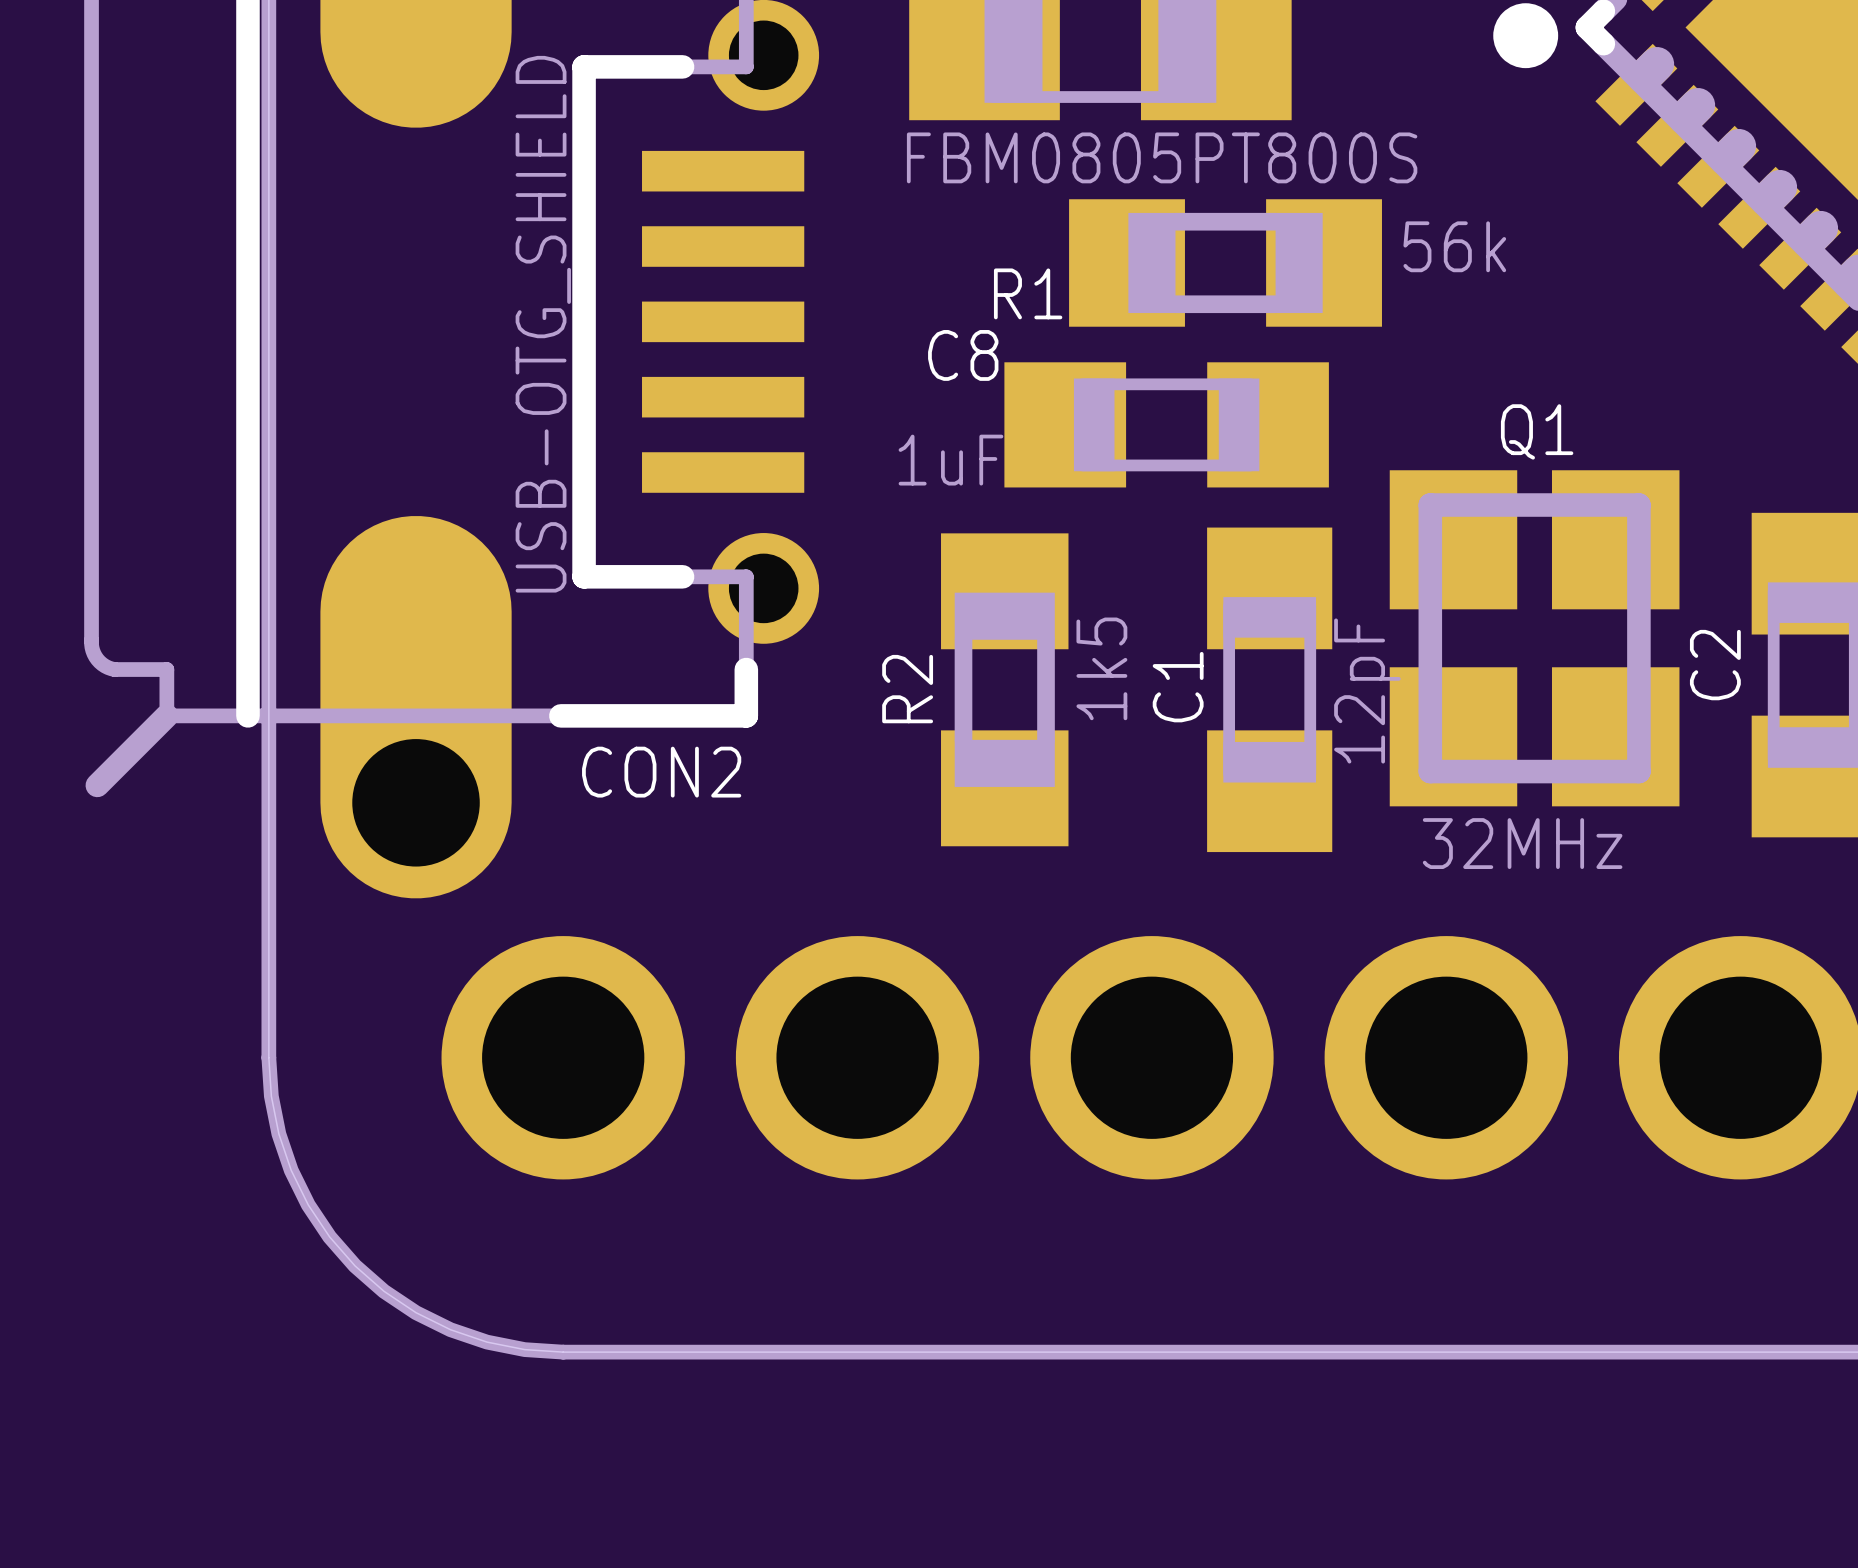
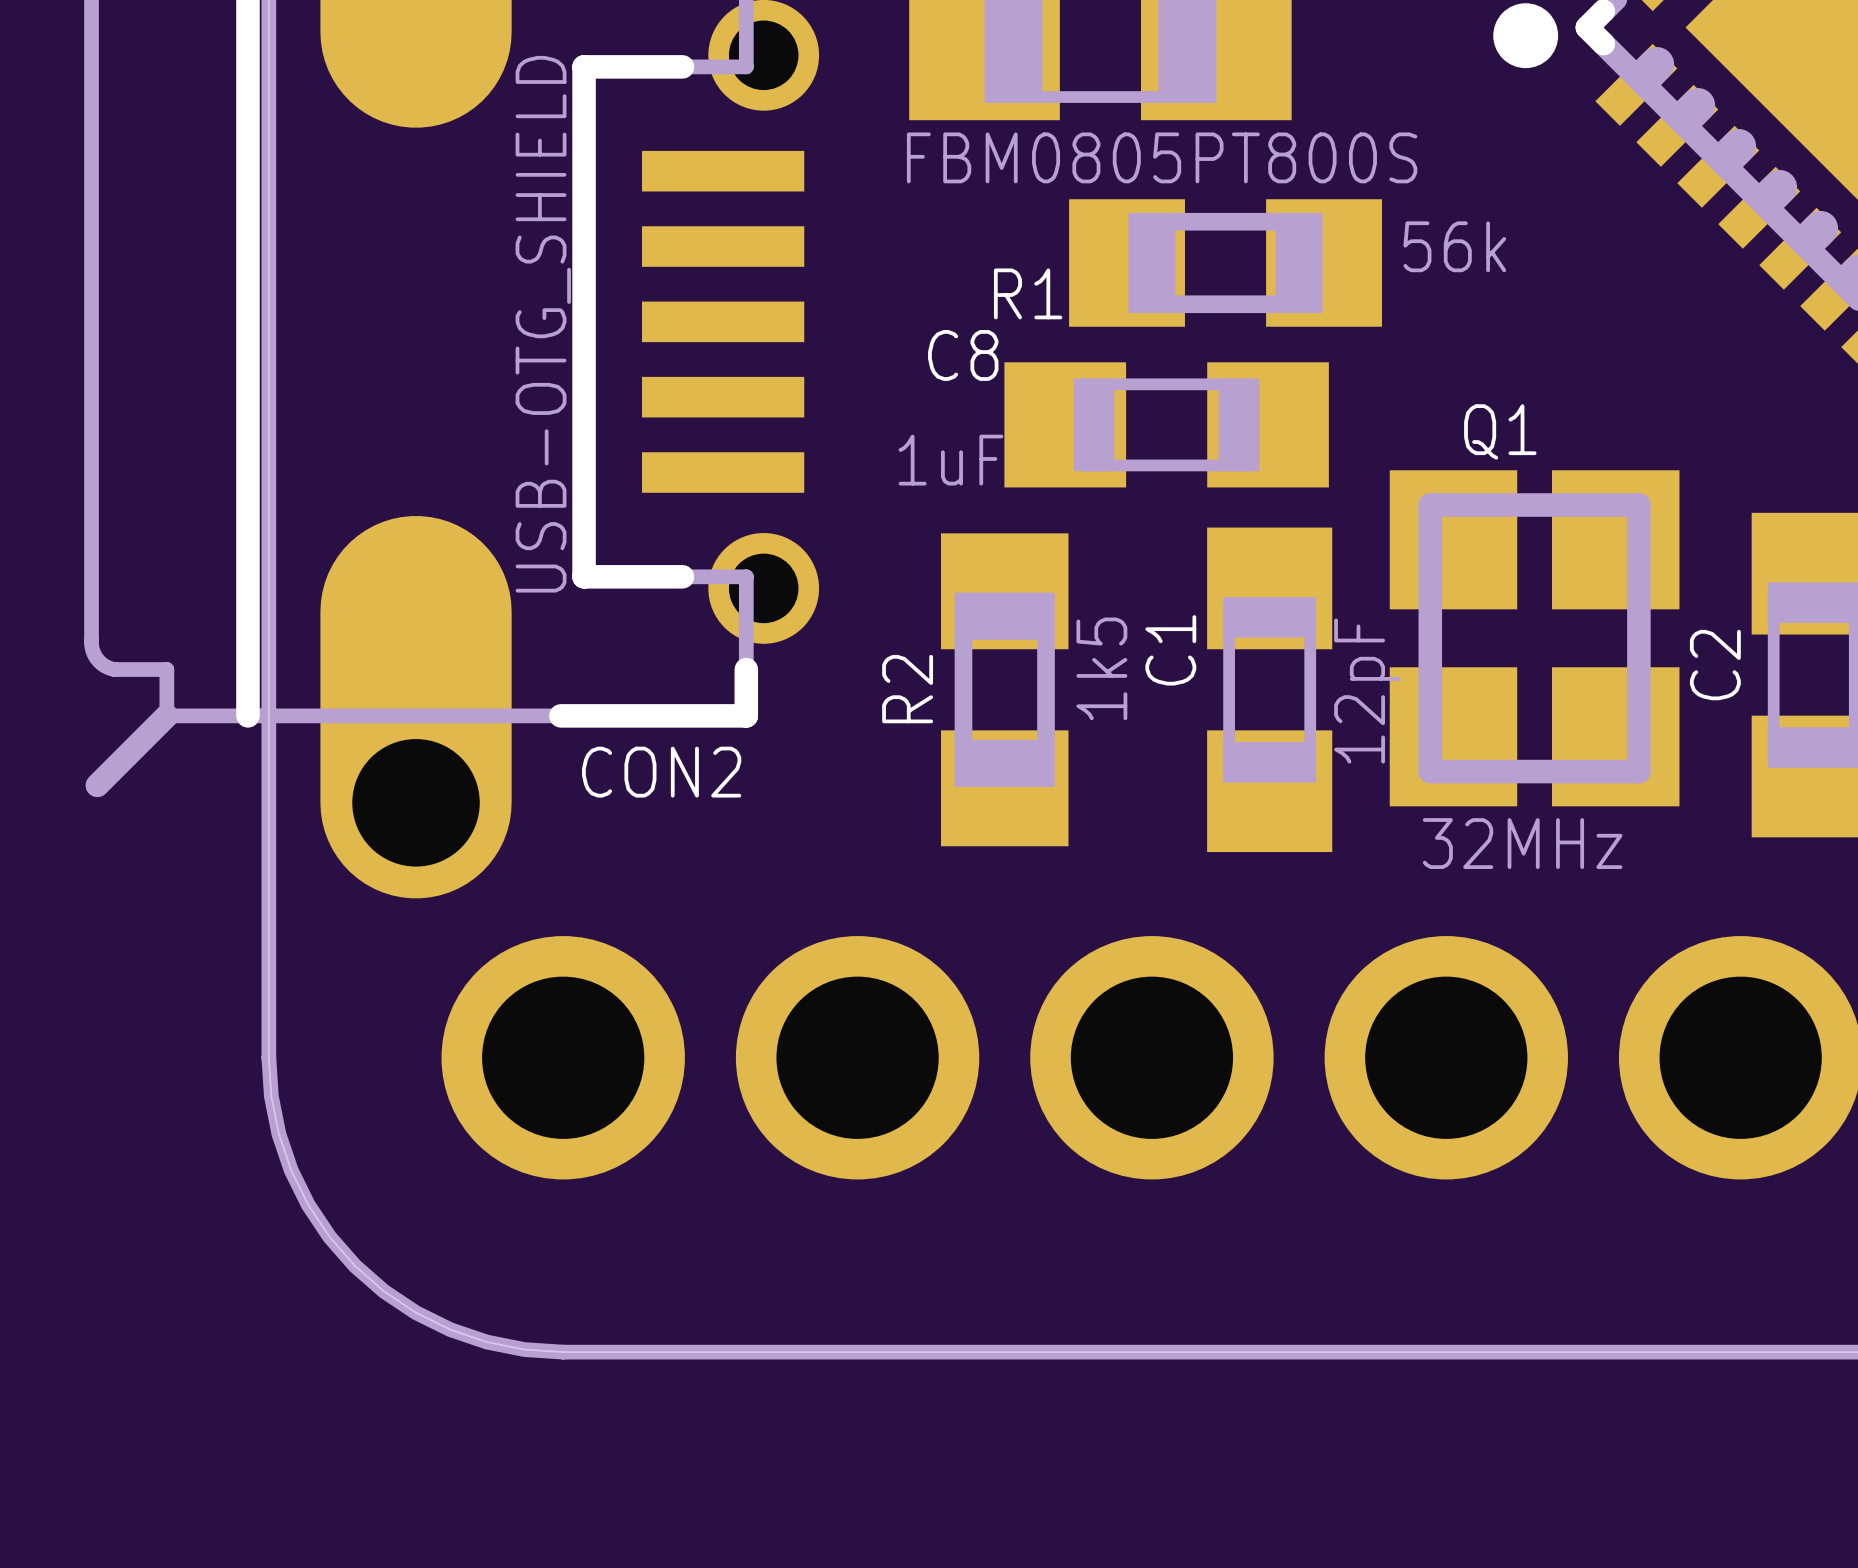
Q1 name position: Q1 (1537, 431) -> Q1 (1500, 431)
C1 name position: C1 (1178, 687) -> C1 (1170, 650)

